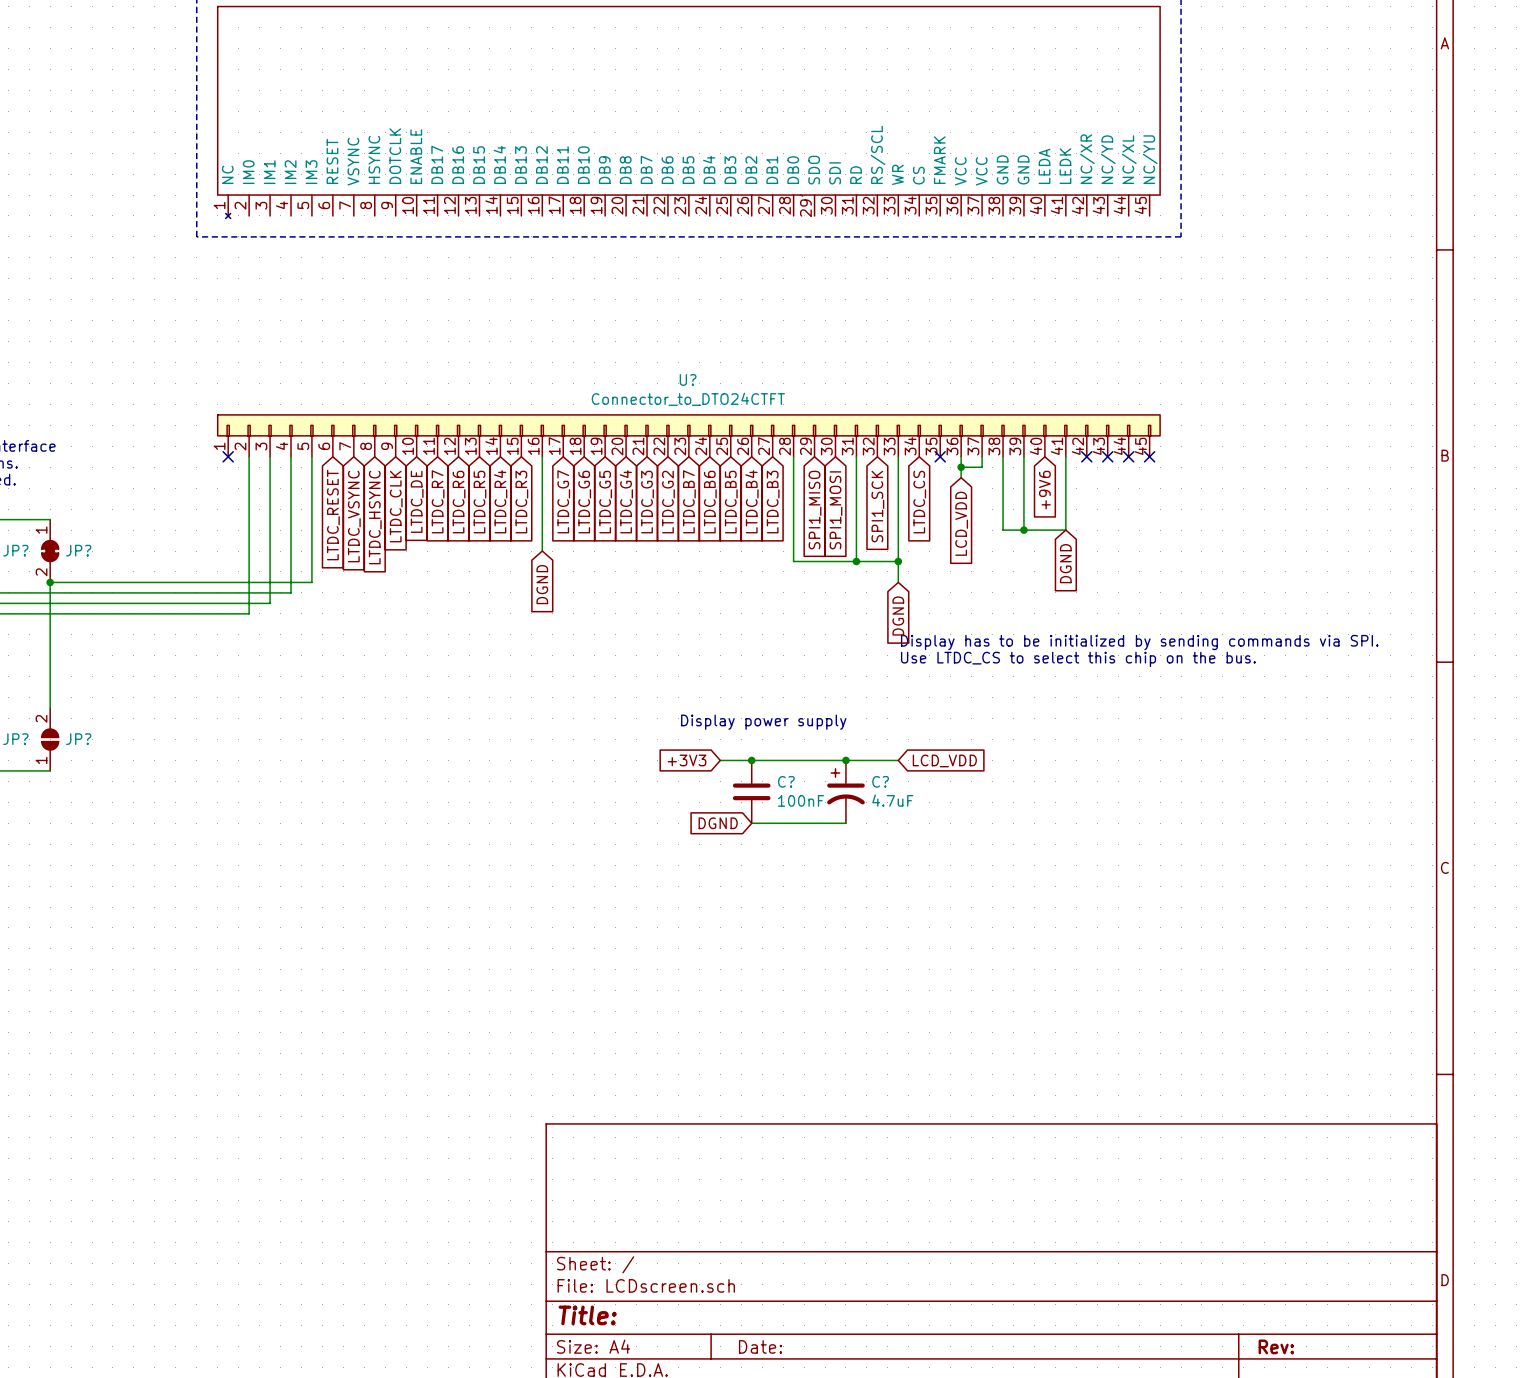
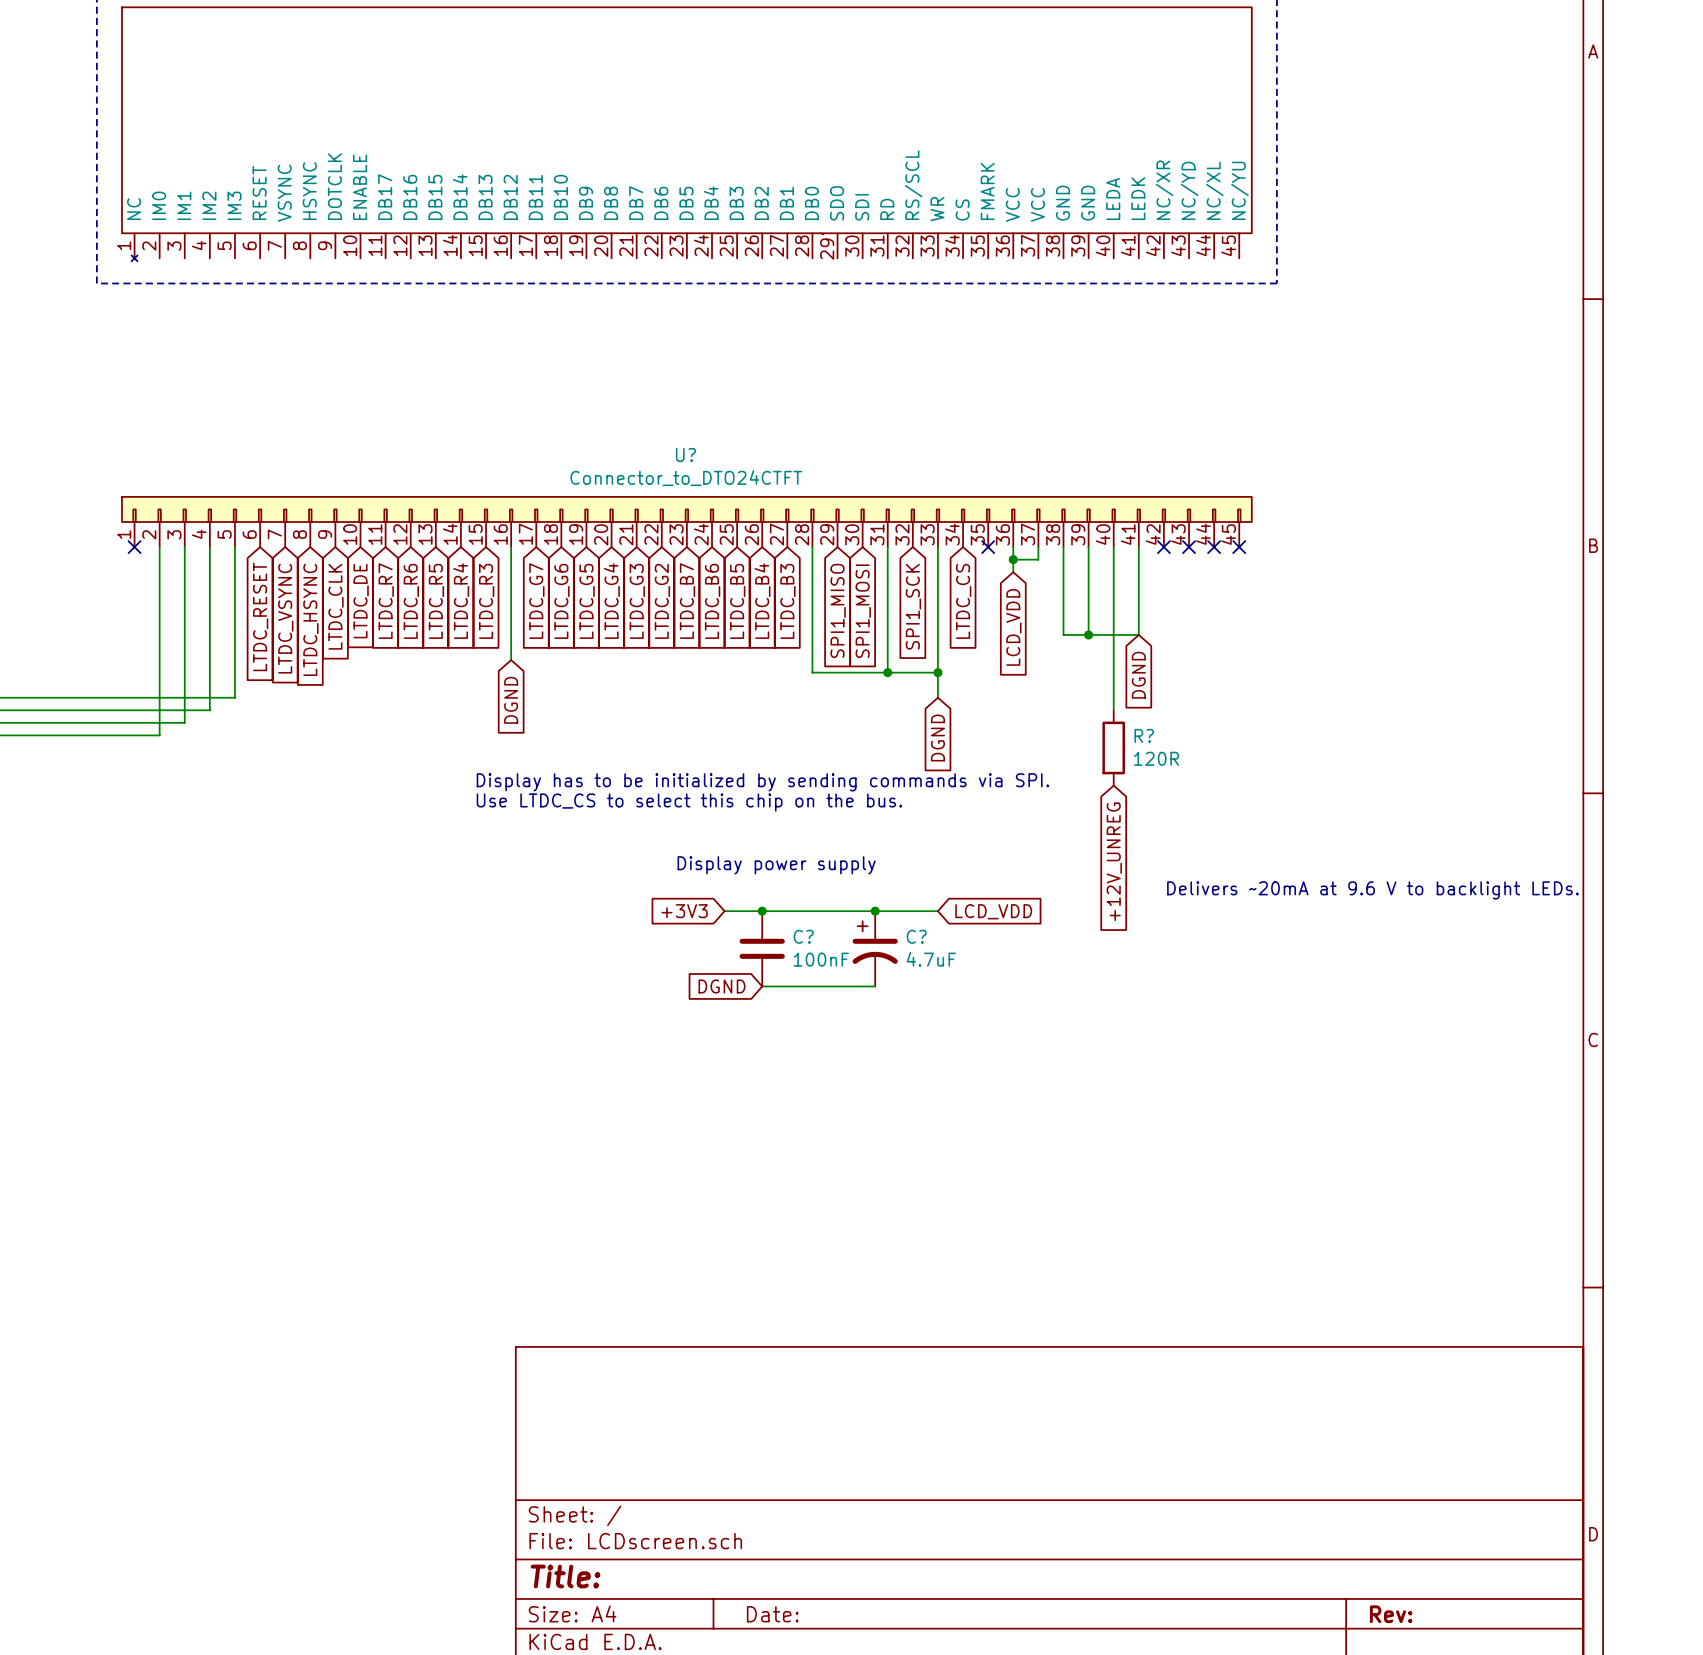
wire: none -> (1113, 547) (1113, 710)
global label: +9V6 (1044, 490) -> none
R?: none -> 120R (1113, 747)
text: Display has to be initialized by sending commands via SPI. (1139, 642) -> none
text: none -> Display has to be initialized by sending commands via SPI. (762, 782)
text: Use LTDC_CS to select this chip on the bus. (1078, 659) -> none
text: none -> Use LTDC_CS to select this chip on the bus. (689, 802)
global label: none -> +12V_UNREG (1114, 861)
text: none -> Delivers ~20mA at 9.6 V to backlight LEDs. (1372, 890)

